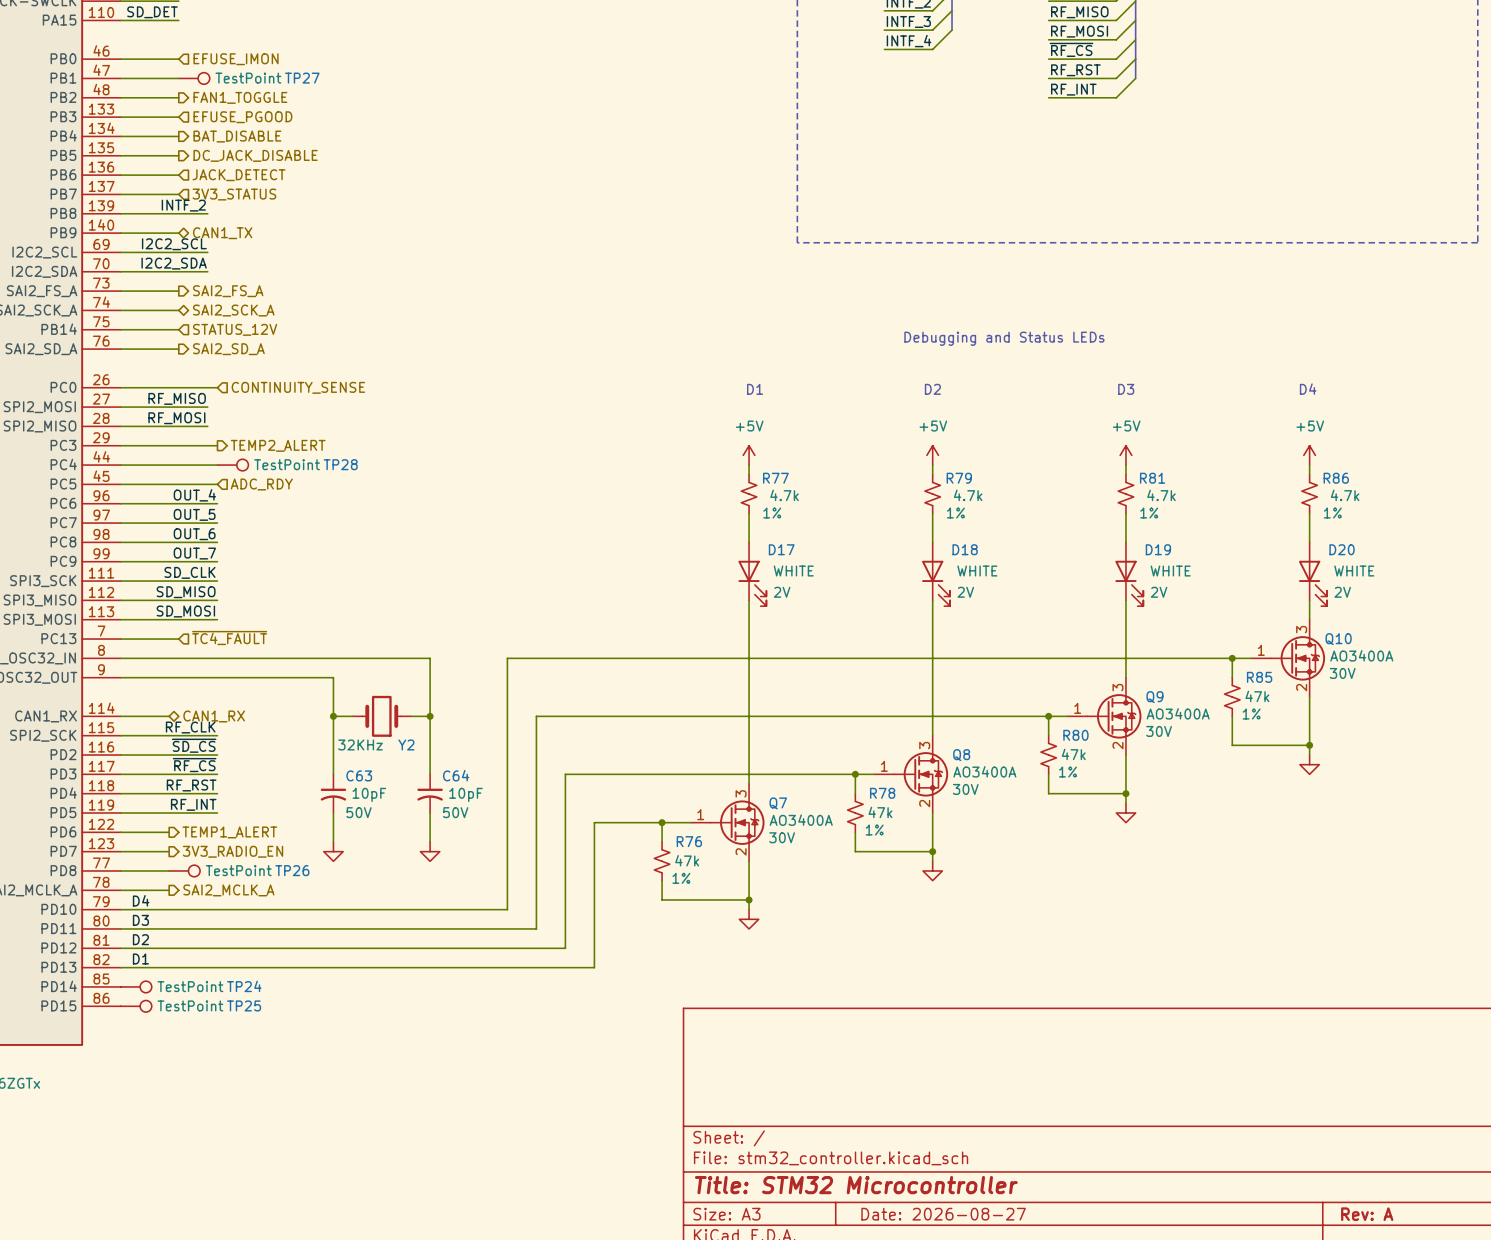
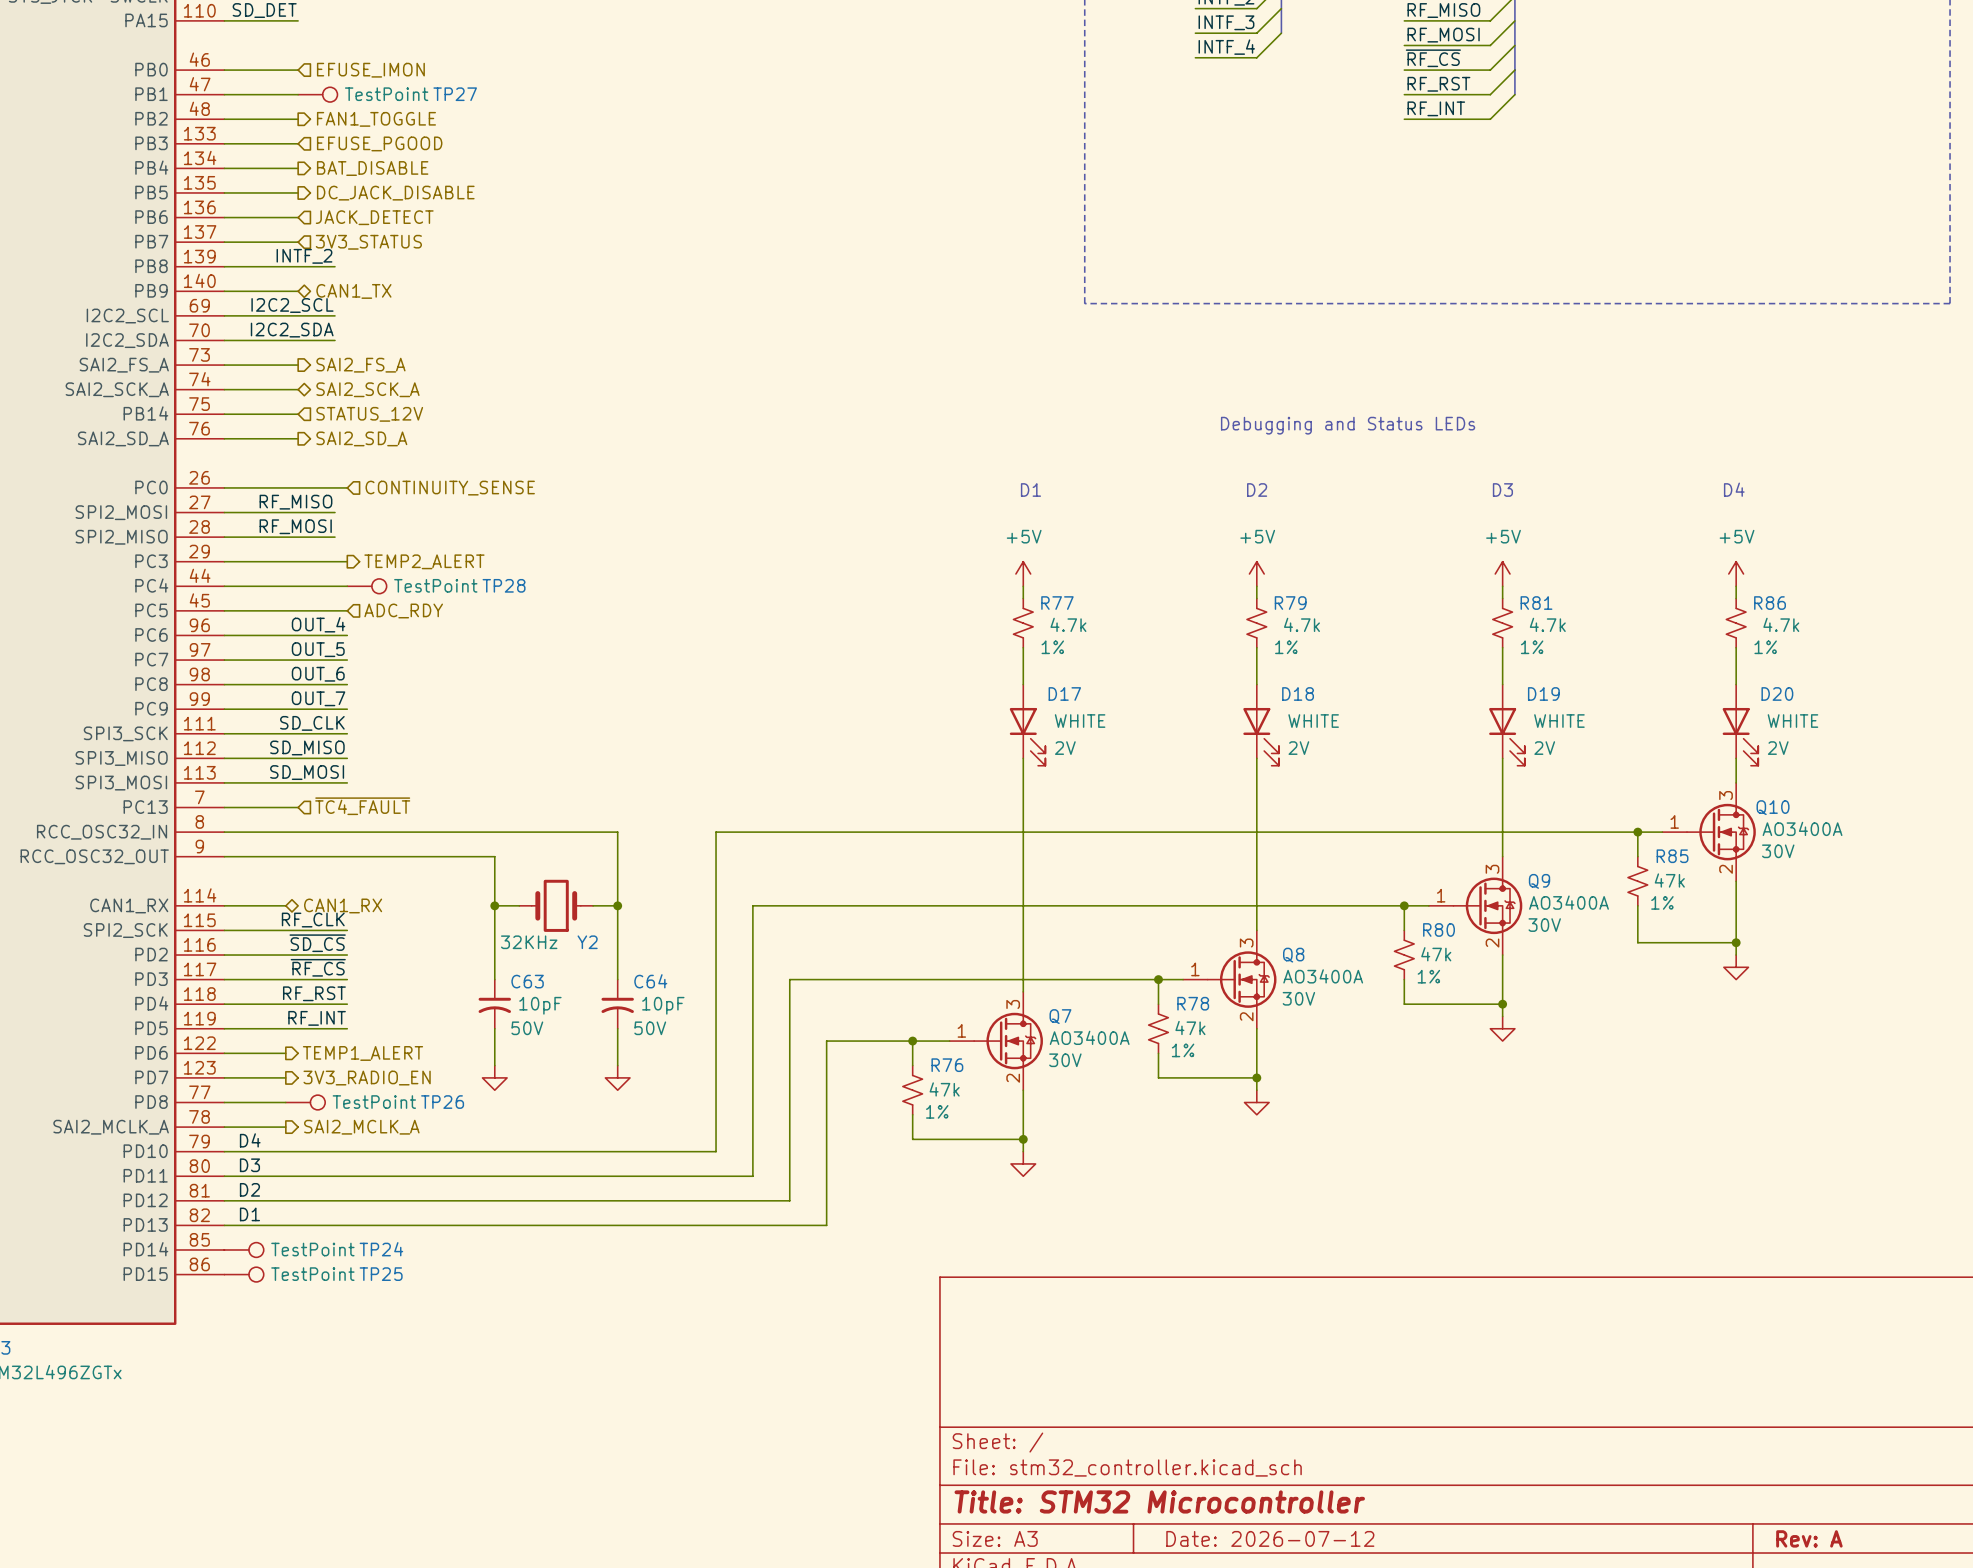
title block: Date: 2026-08-27 (943, 1214) -> Date: 2026-07-12 (1270, 1538)

